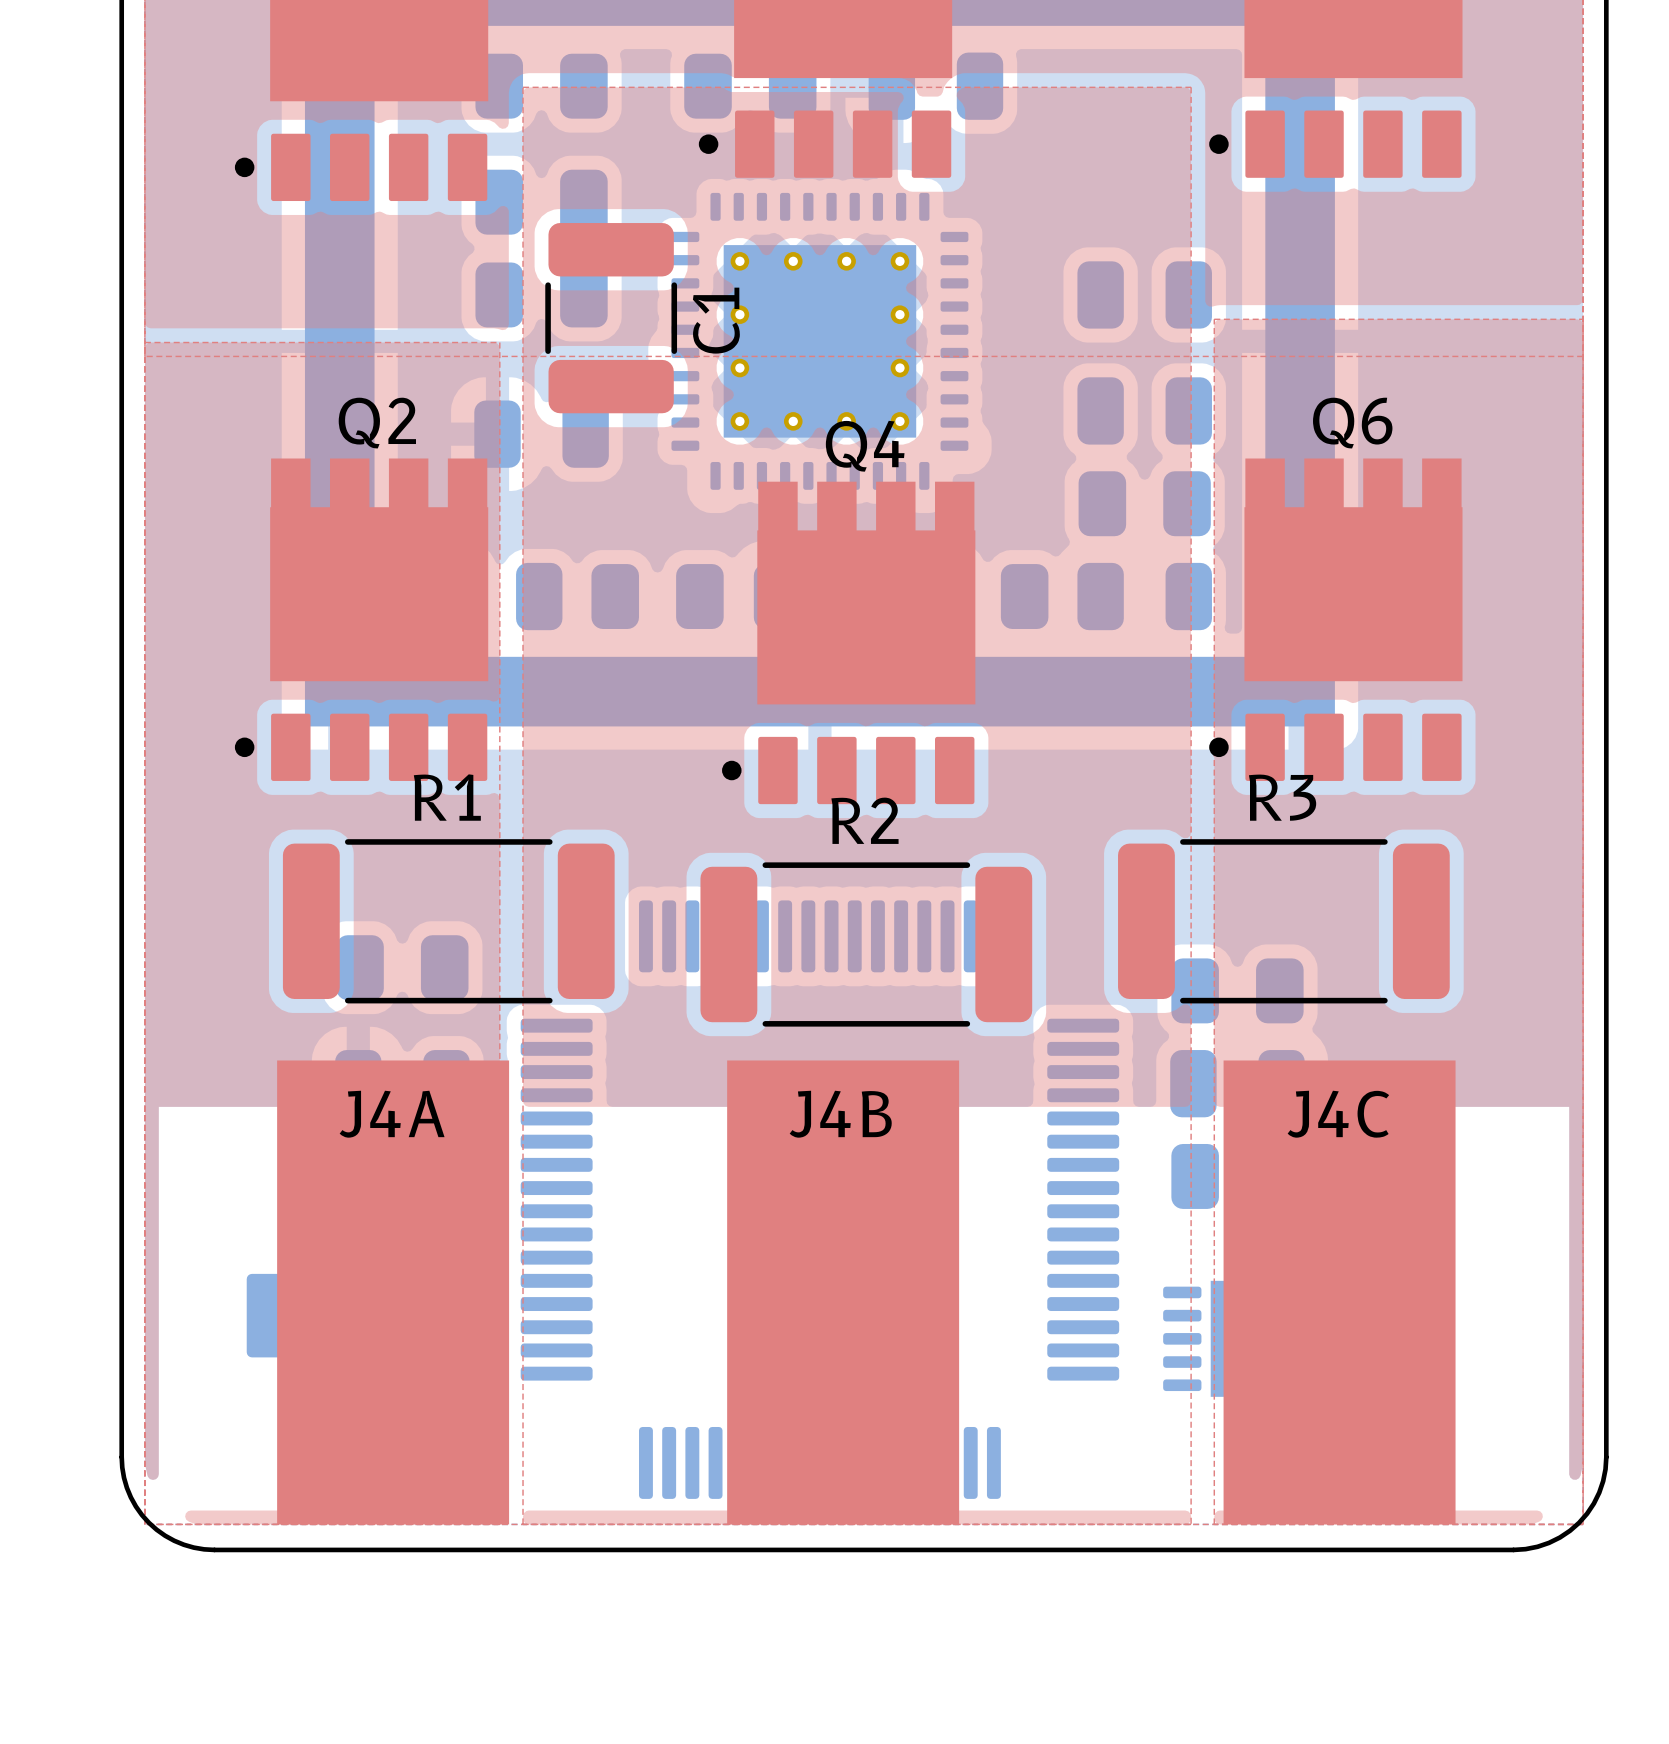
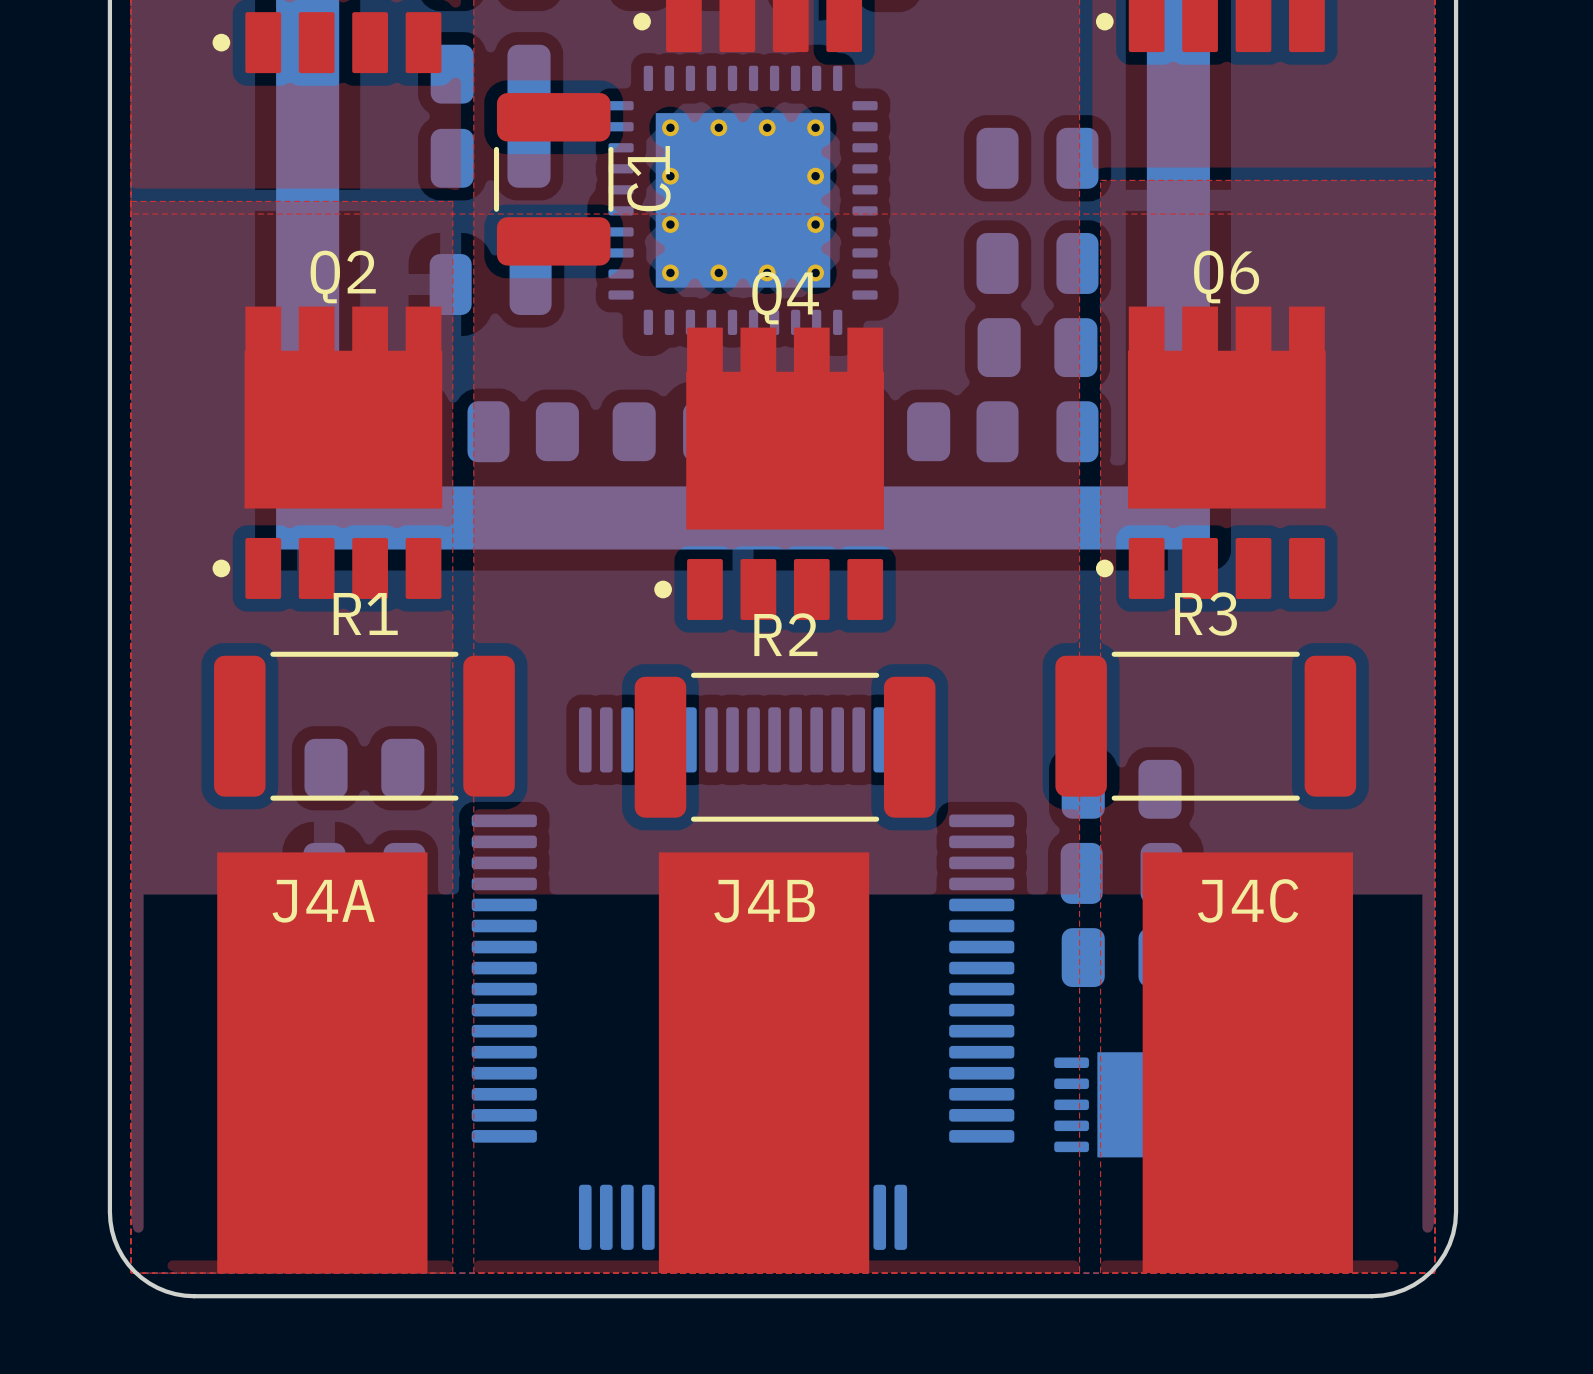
R1 position: (448, 921) -> (364, 726)
R3 position: (1283, 921) -> (1205, 726)
J4A position: (393, 1292) -> (322, 1062)
J4C position: (1339, 1292) -> (1247, 1062)

